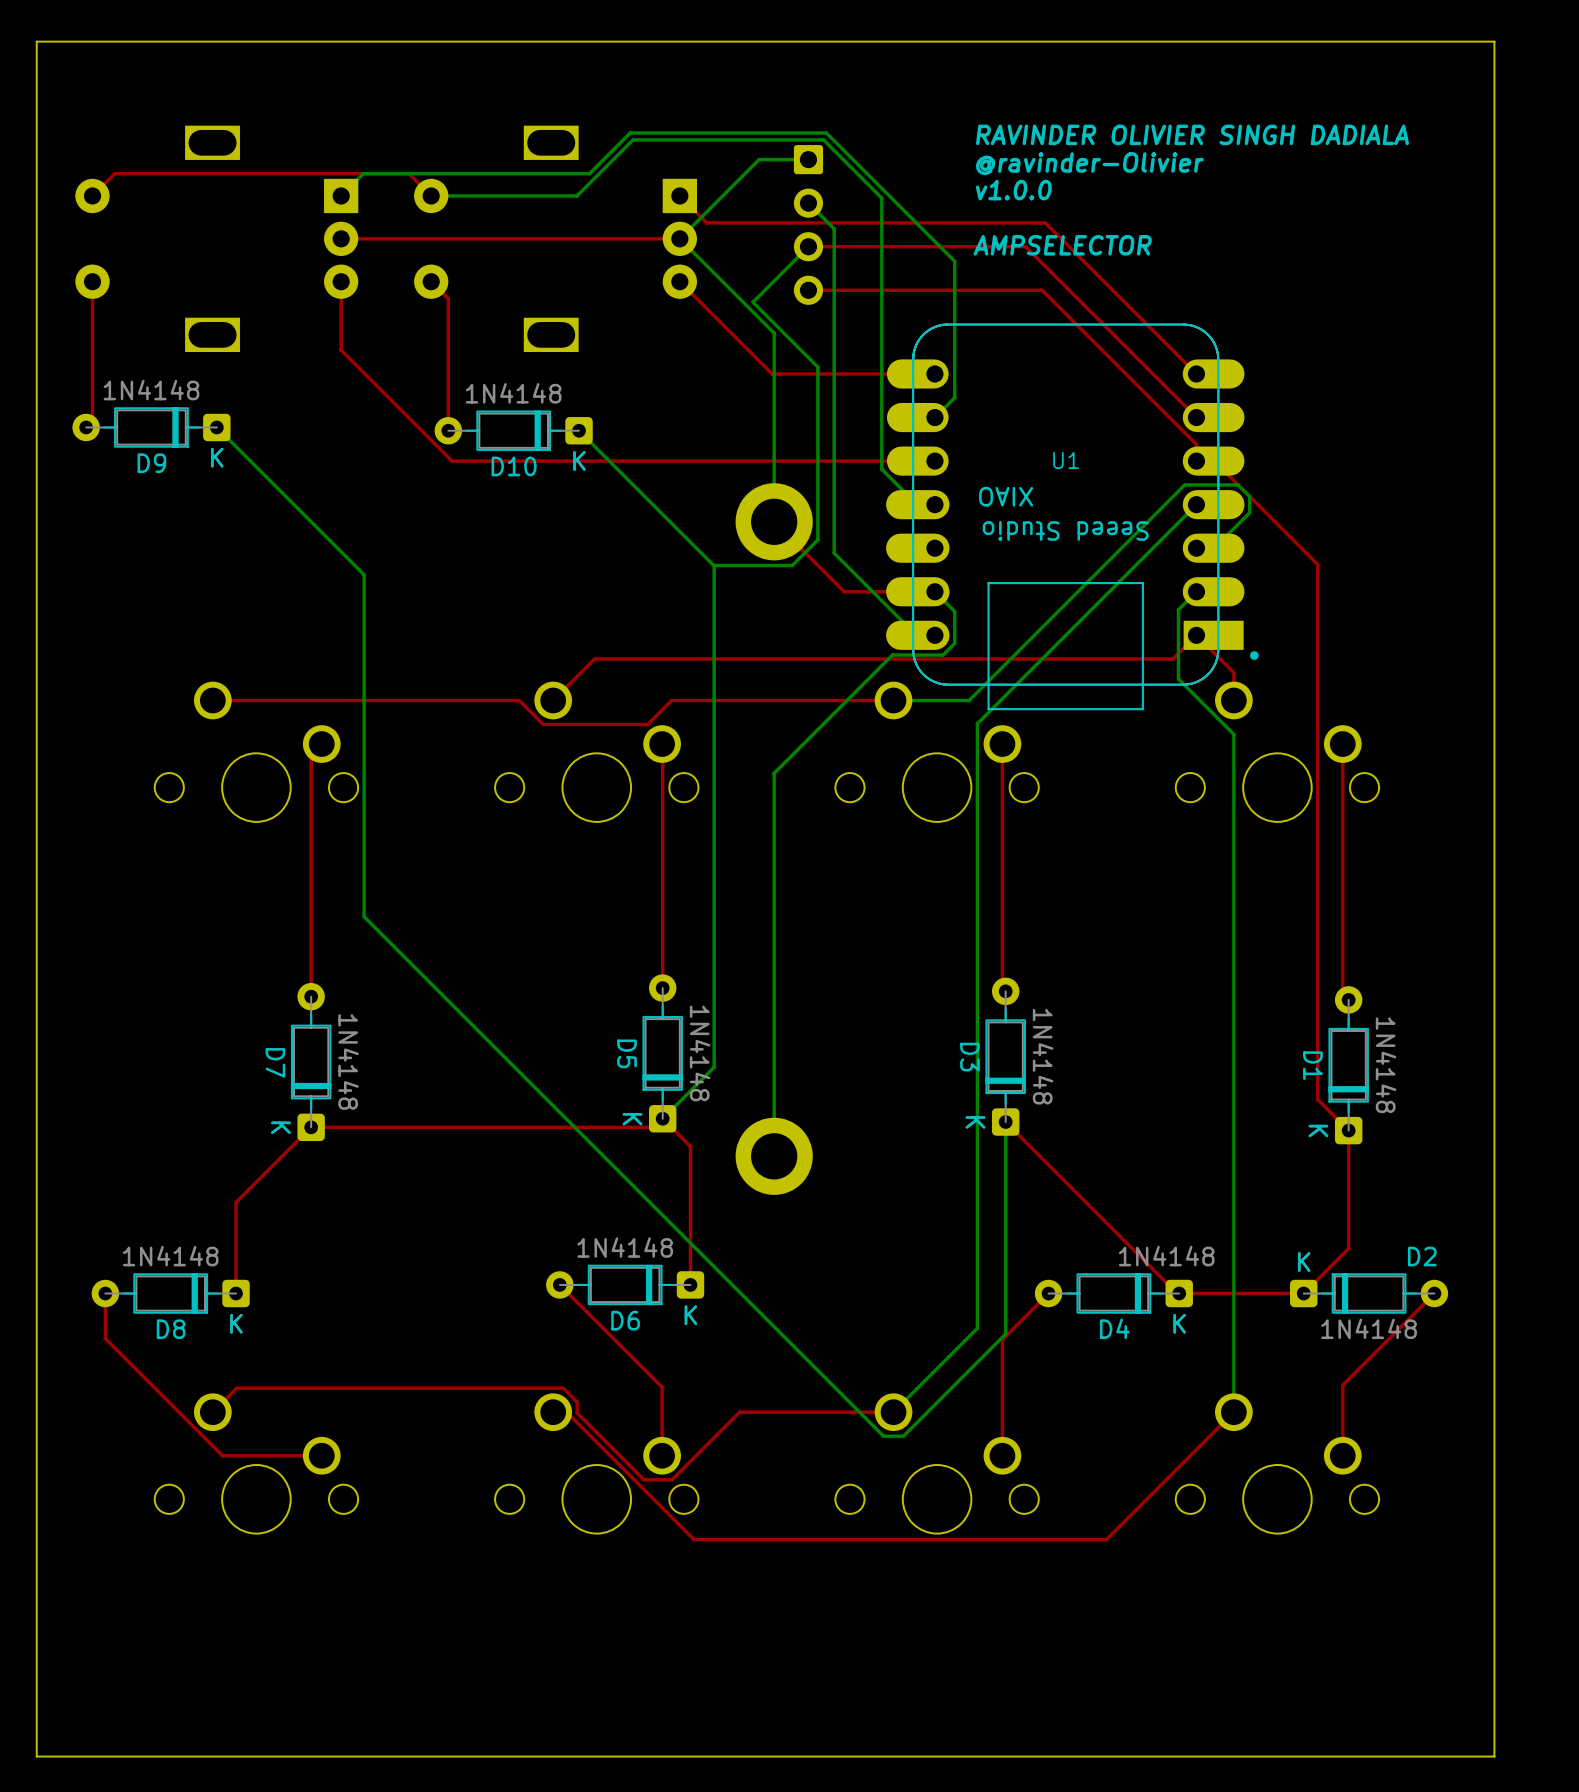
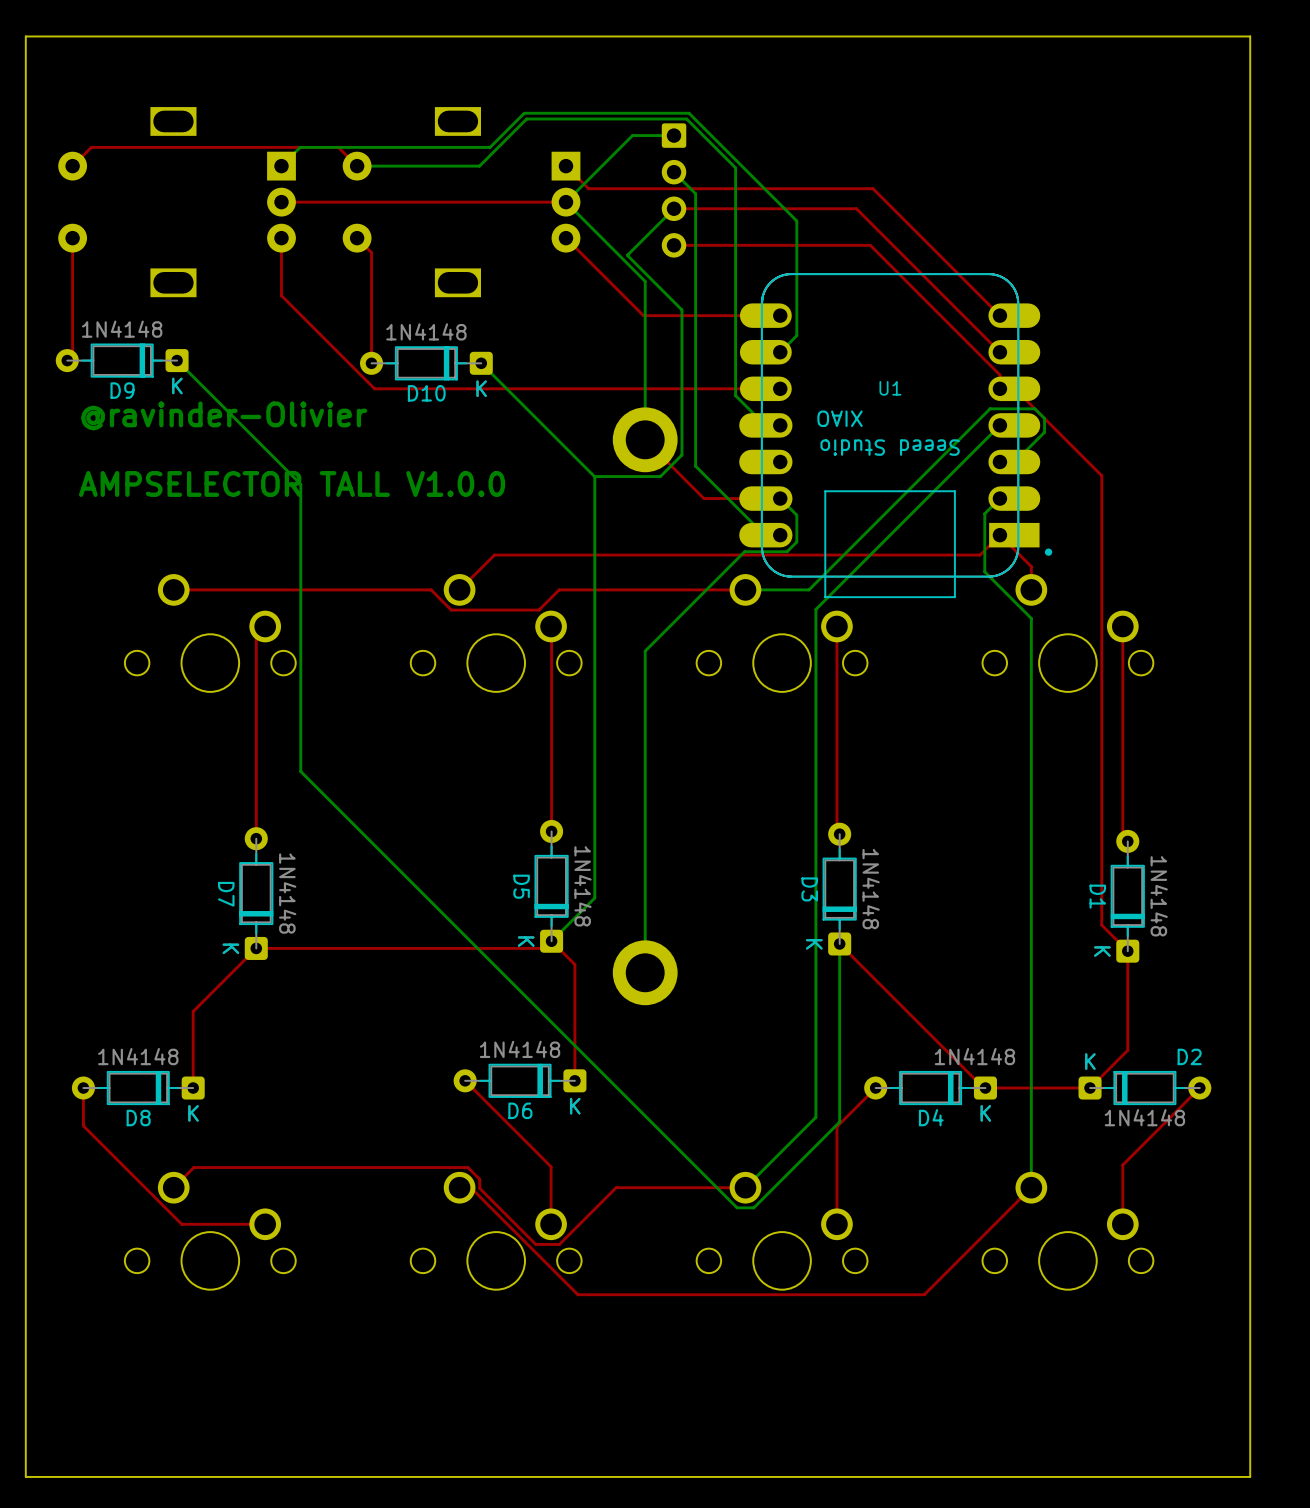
text: RAVINDER OLIVIER SINGH DADIALA (1192, 134) -> none
text: @ravinder-Olivier (1089, 163) -> none
text: v1.0.0 (1013, 190) -> none
text: AMPSELECTOR (1062, 245) -> none
text: none -> @ravinder-Olivier (224, 415)
text: none -> AMPSELECTOR TALL V1.0.0 (292, 483)

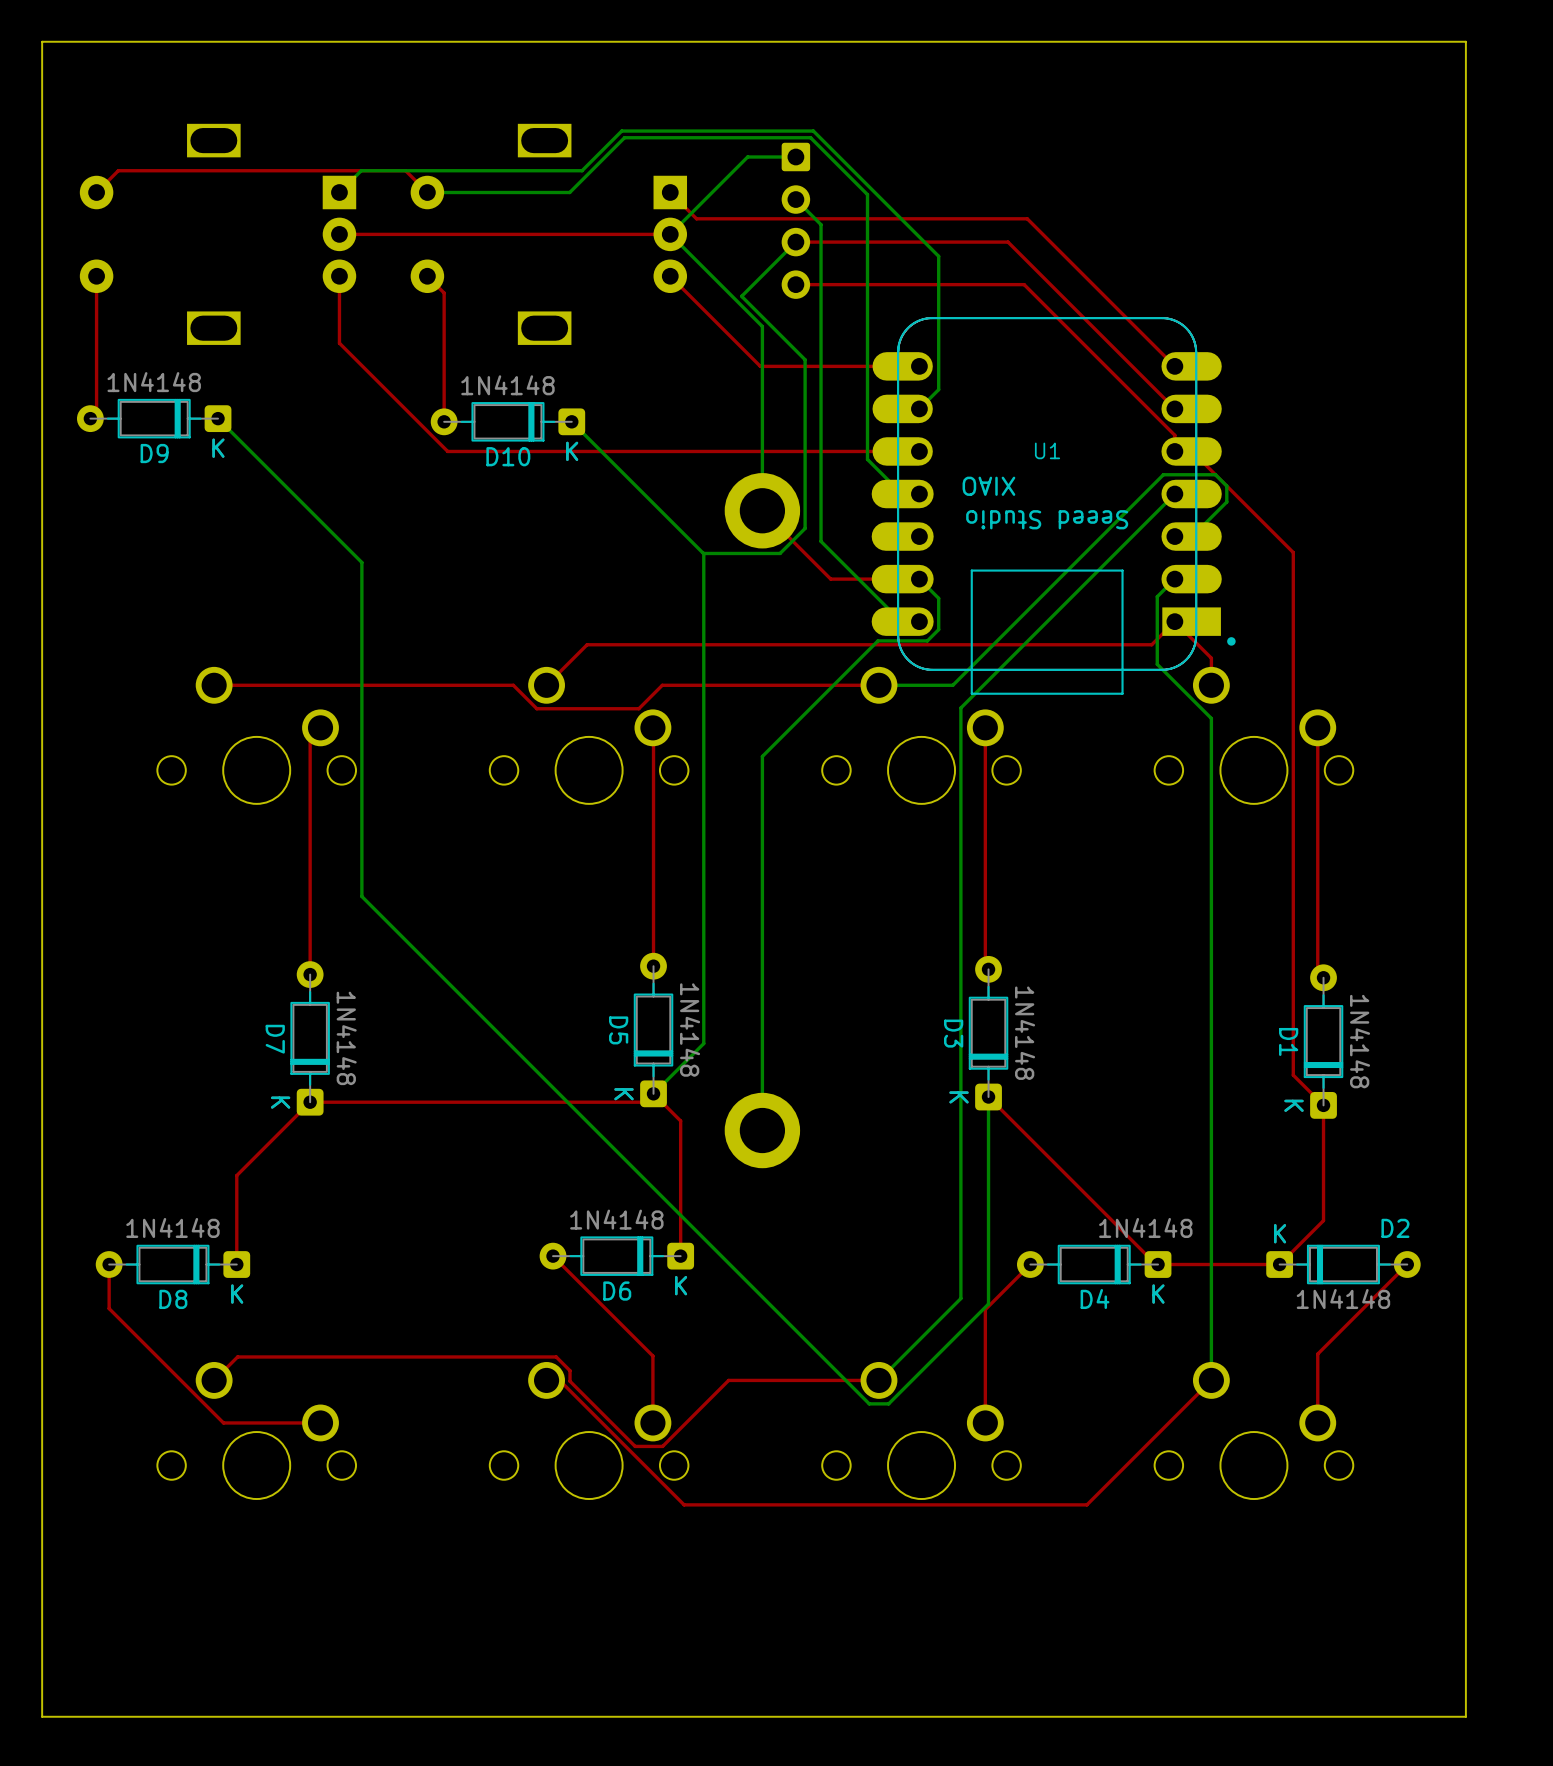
text: @ravinder-Olivier (224, 415) -> none
text: AMPSELECTOR TALL V1.0.0 (292, 483) -> none

